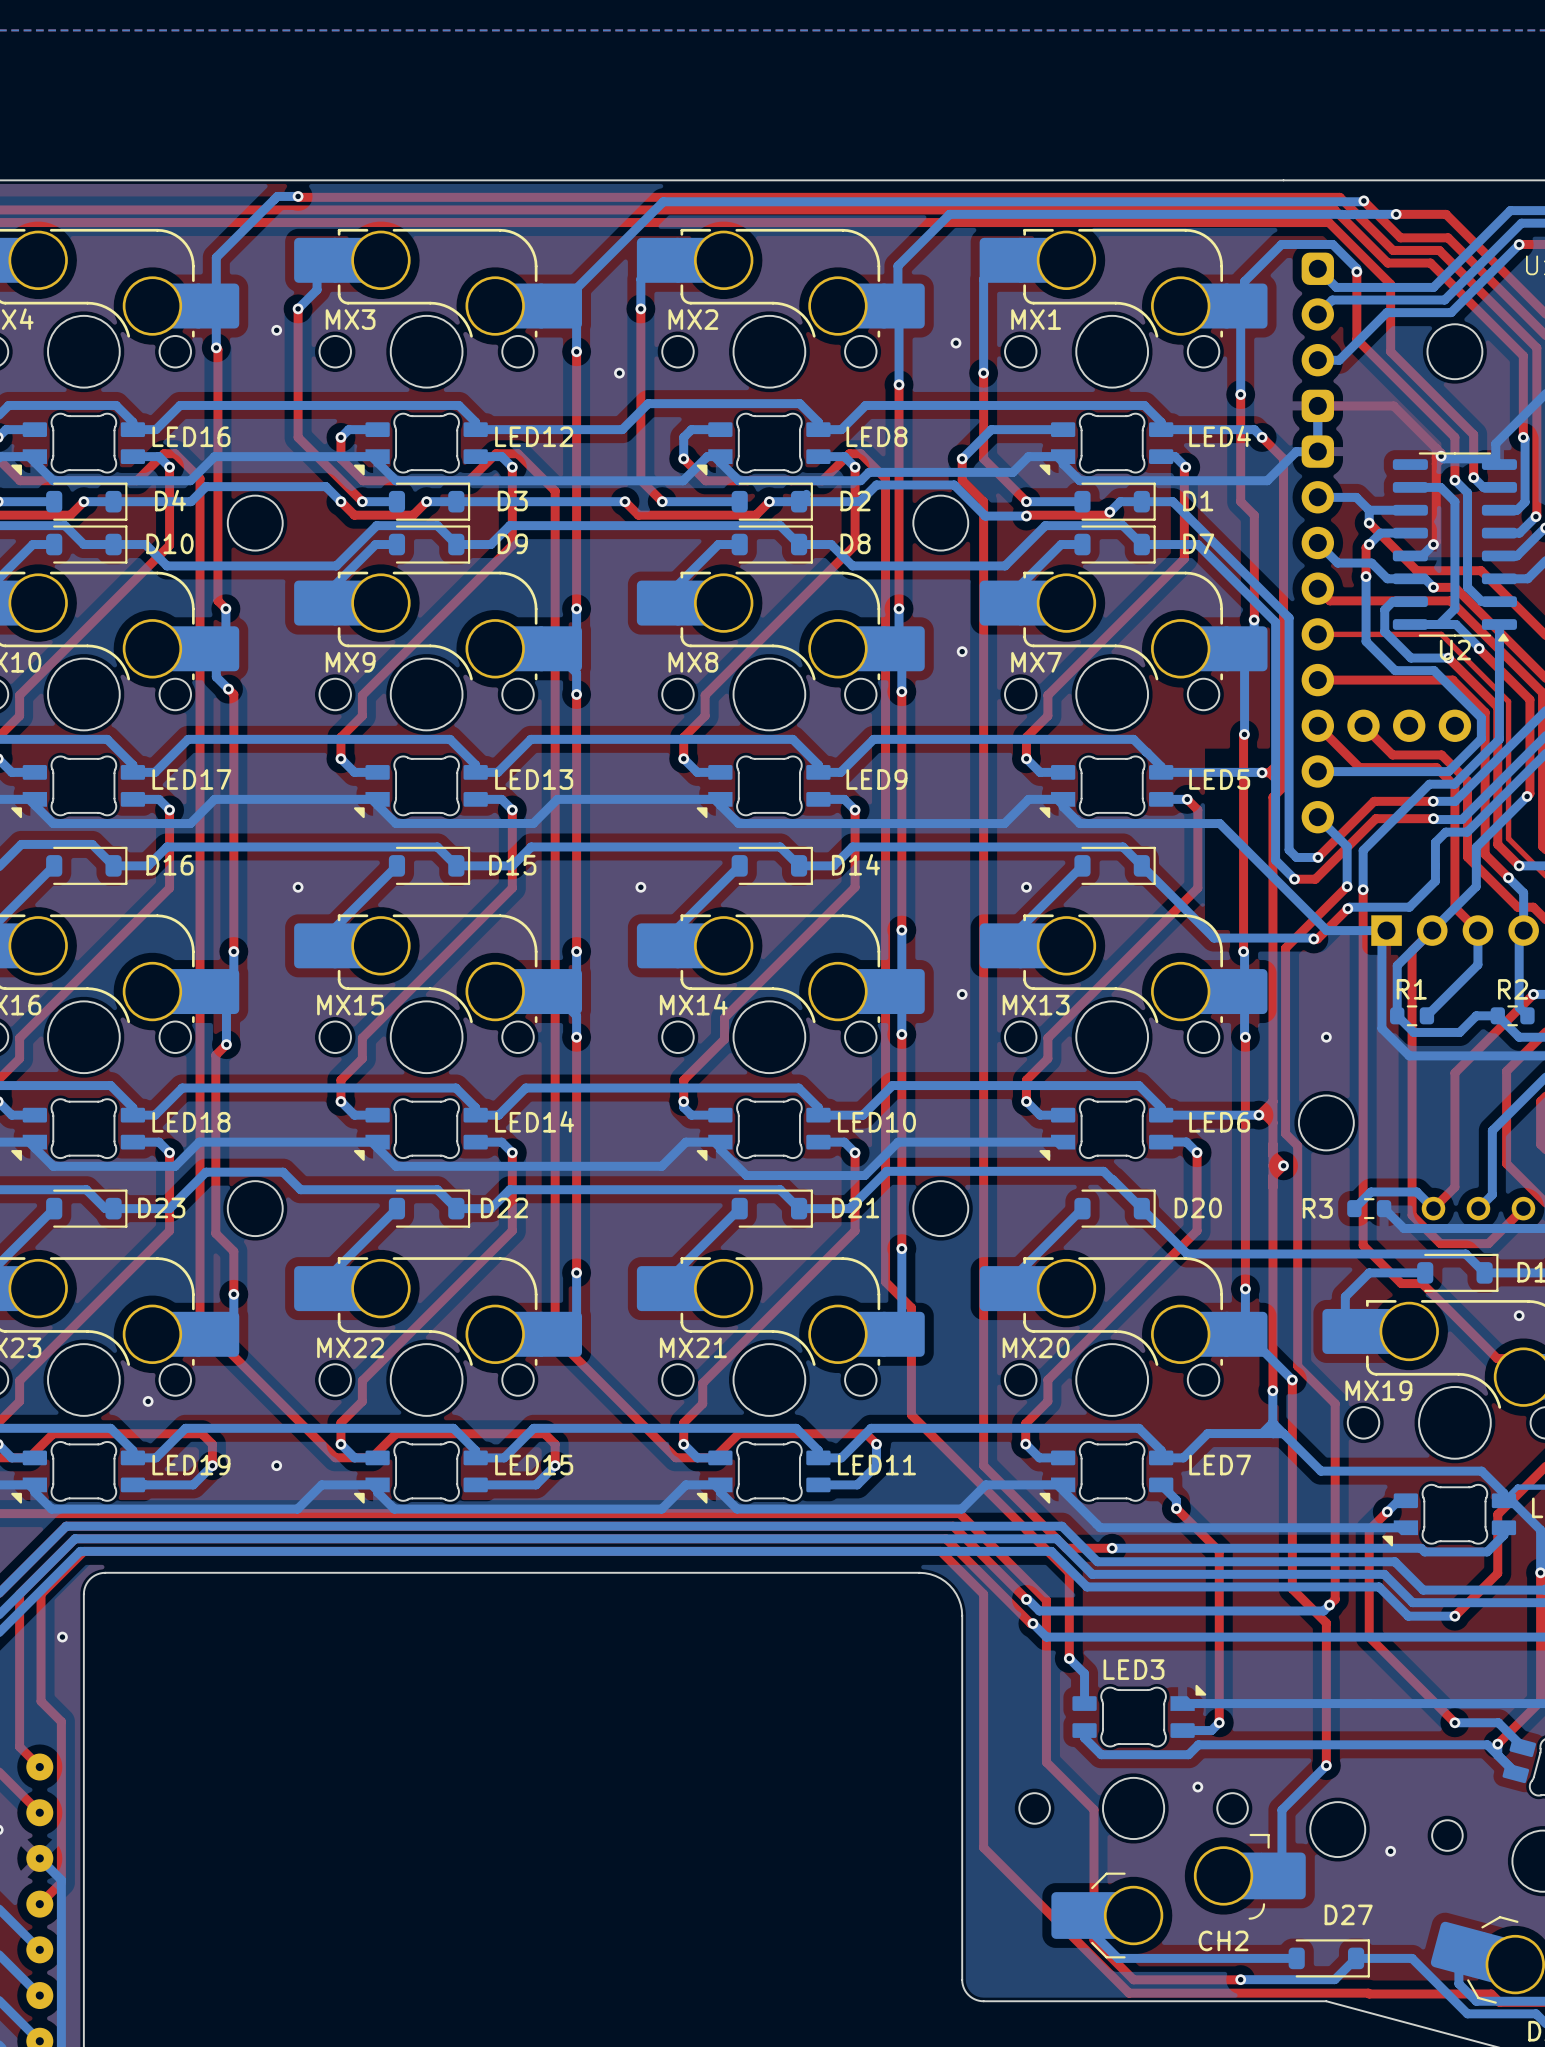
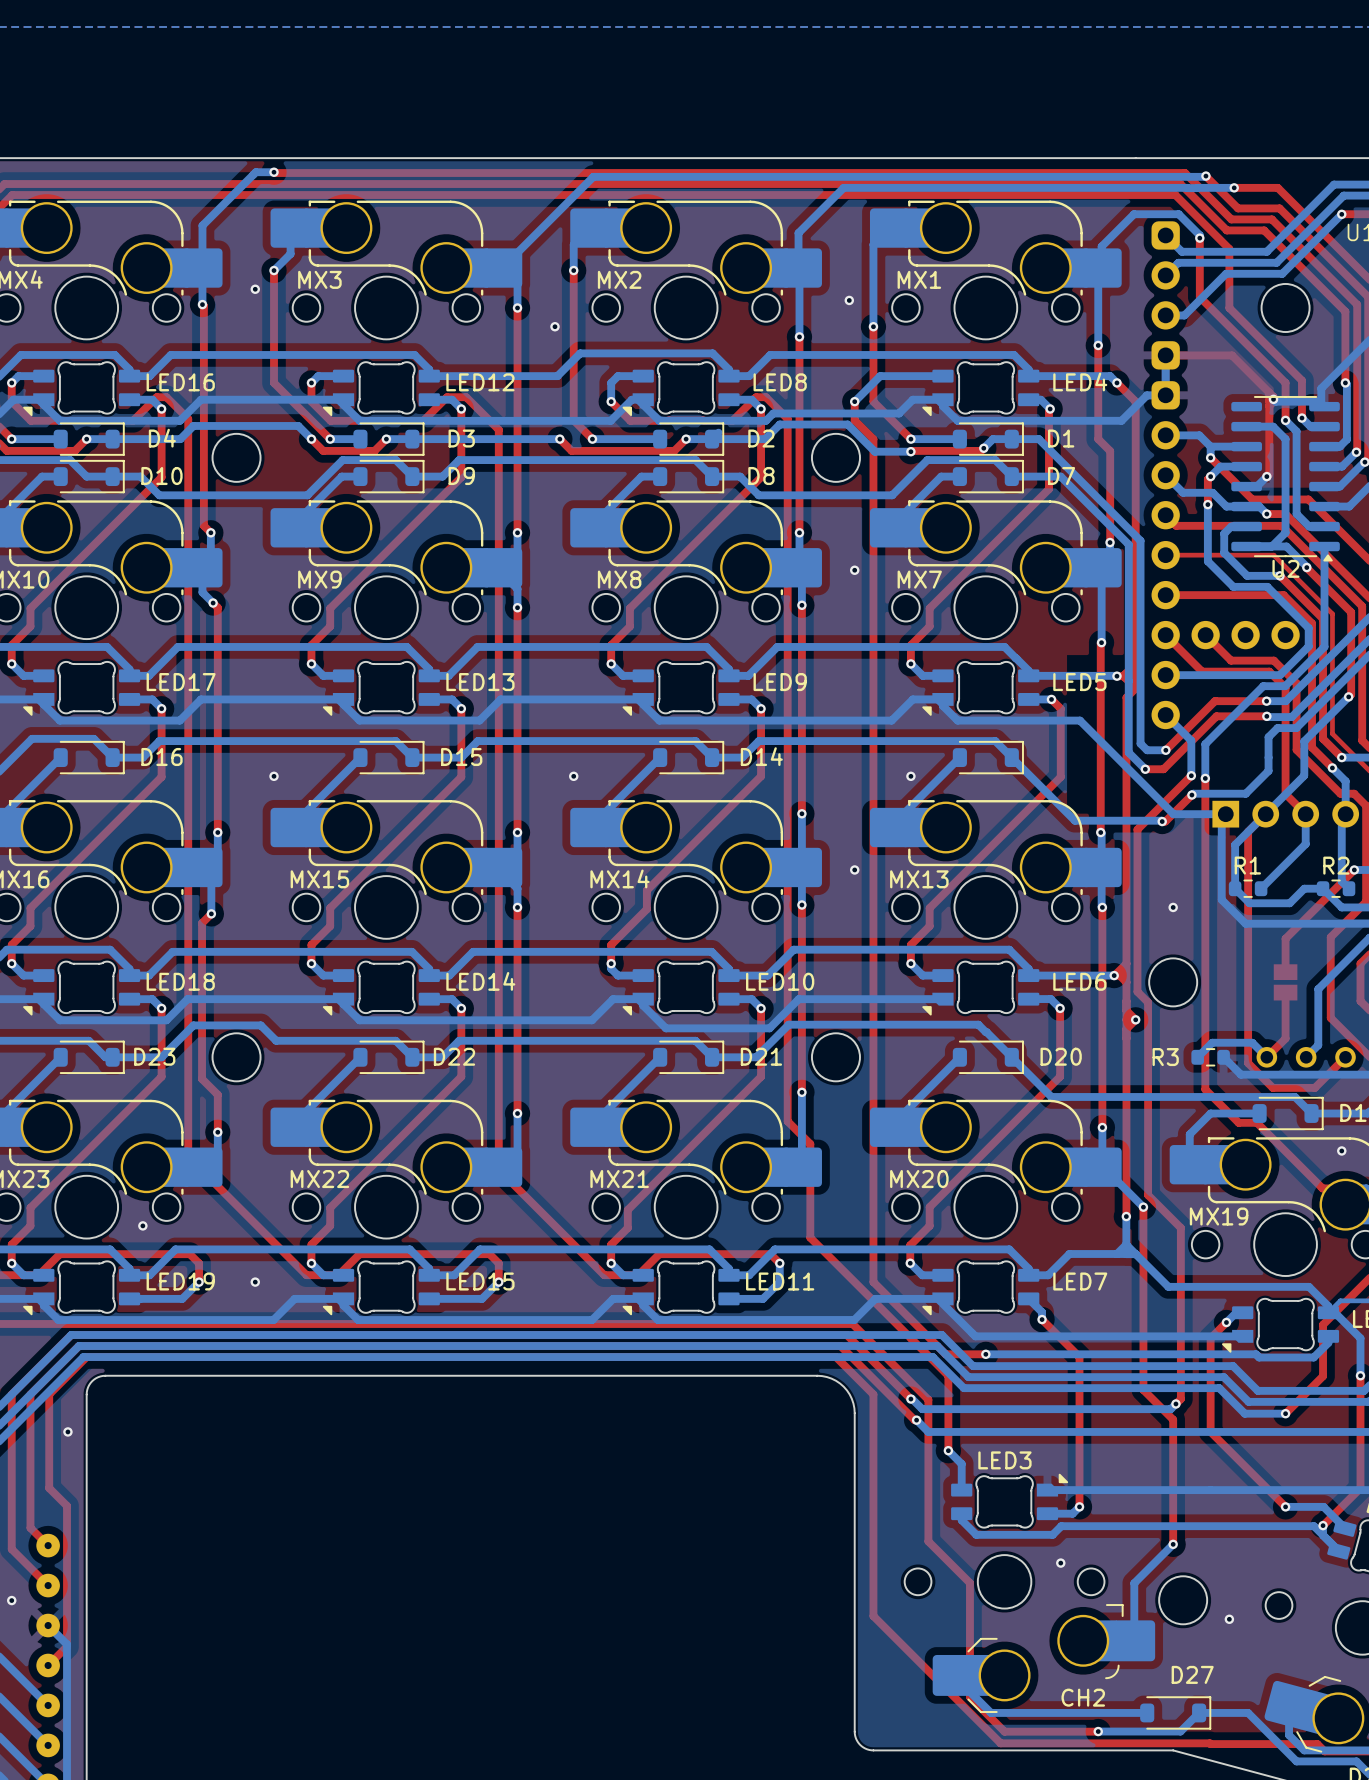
top track: (1454, 1111) (1454, 1134) -> none
part: none -> (1285, 982)

